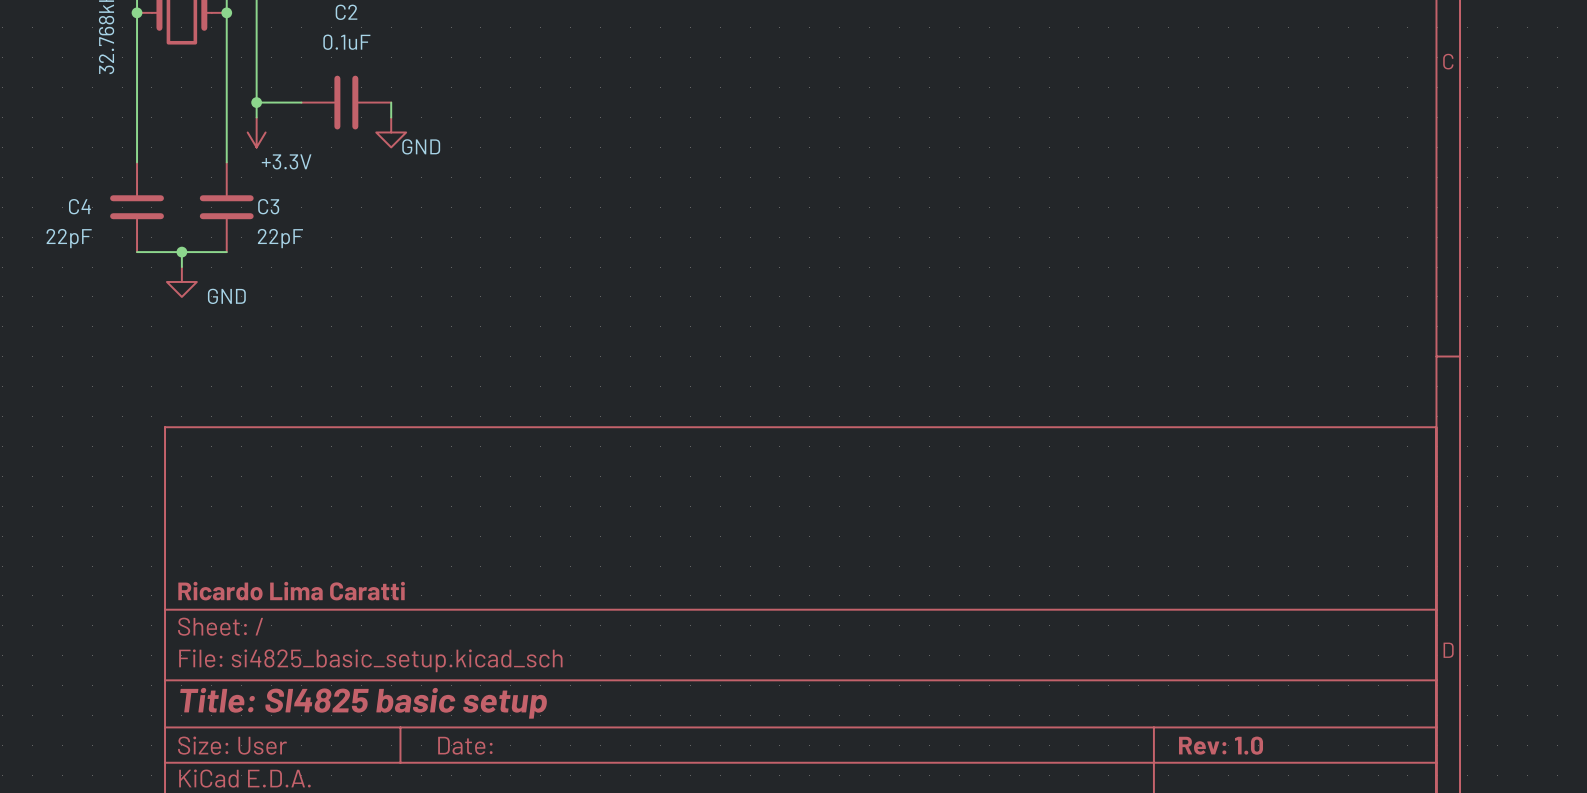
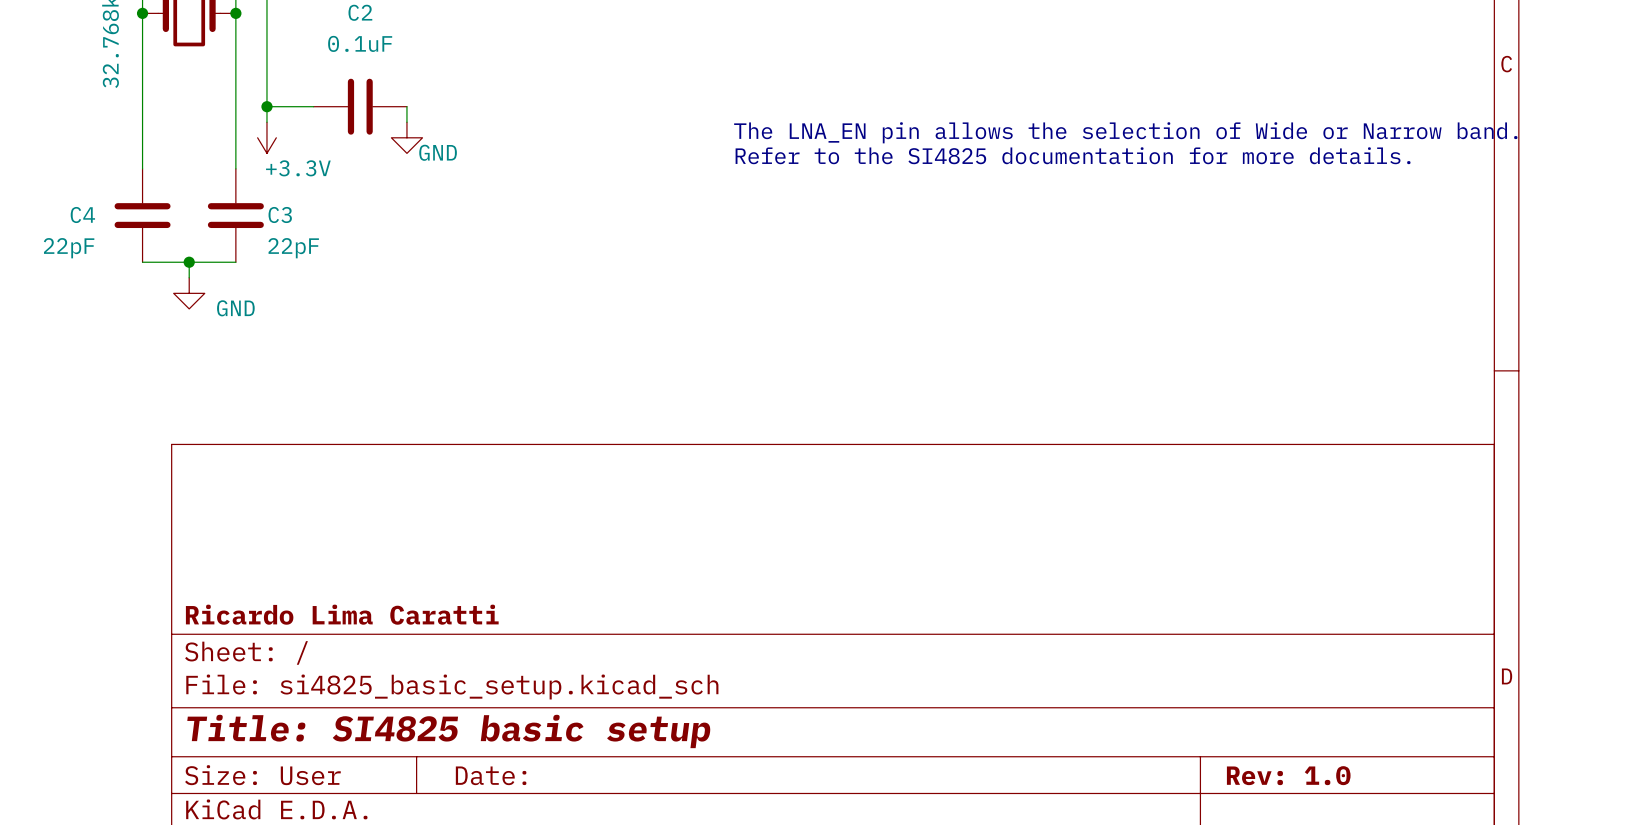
text: none -> The LNA_EN pin allows the selection of Wide or Narrow band. (1125, 132)
text: none -> Refer to the SI4825 documentation for more details. (1073, 155)

